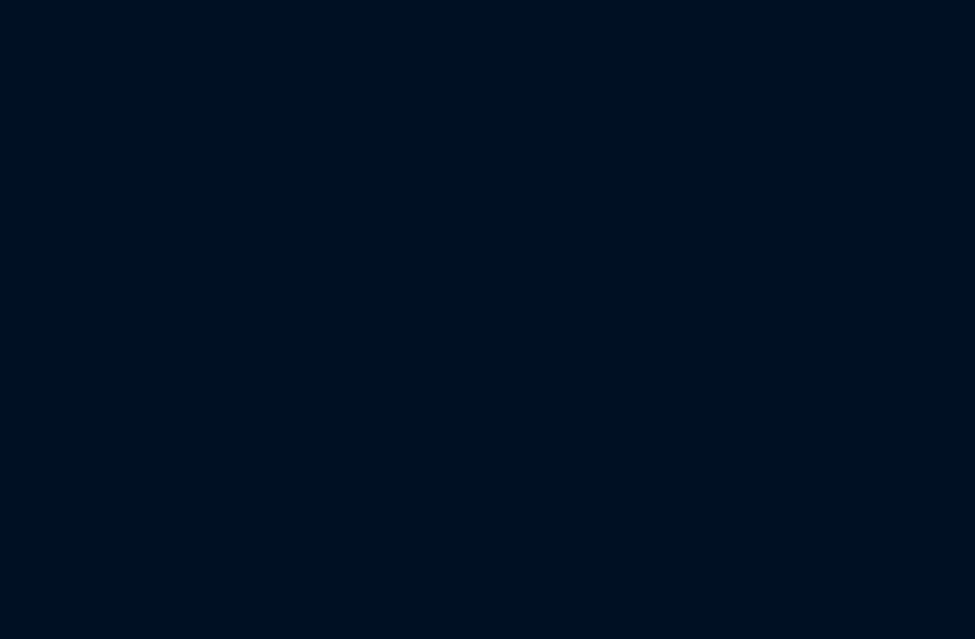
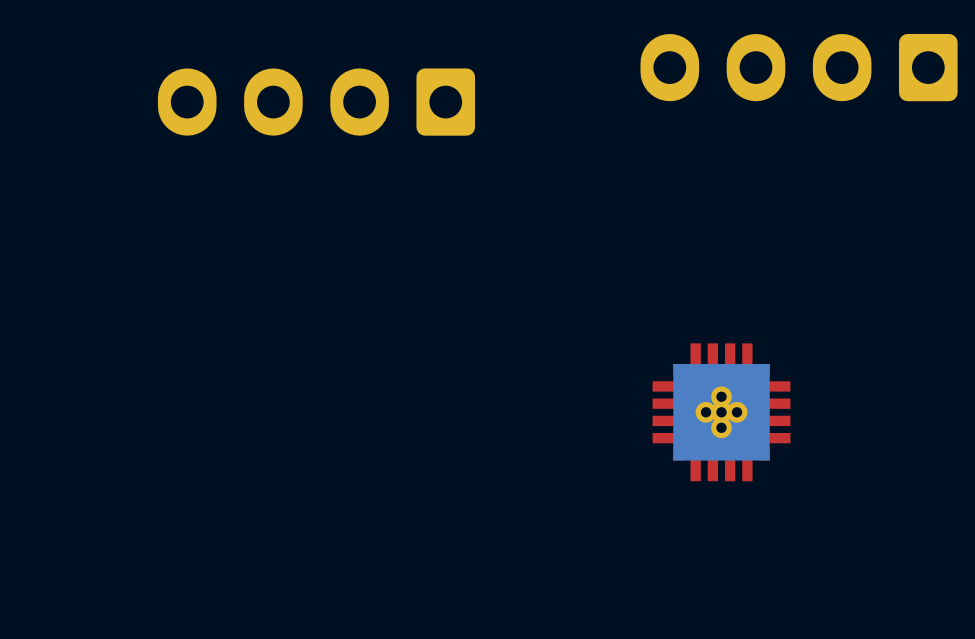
part: none -> (799, 67)
part: none -> (316, 102)
part: none -> (721, 412)

